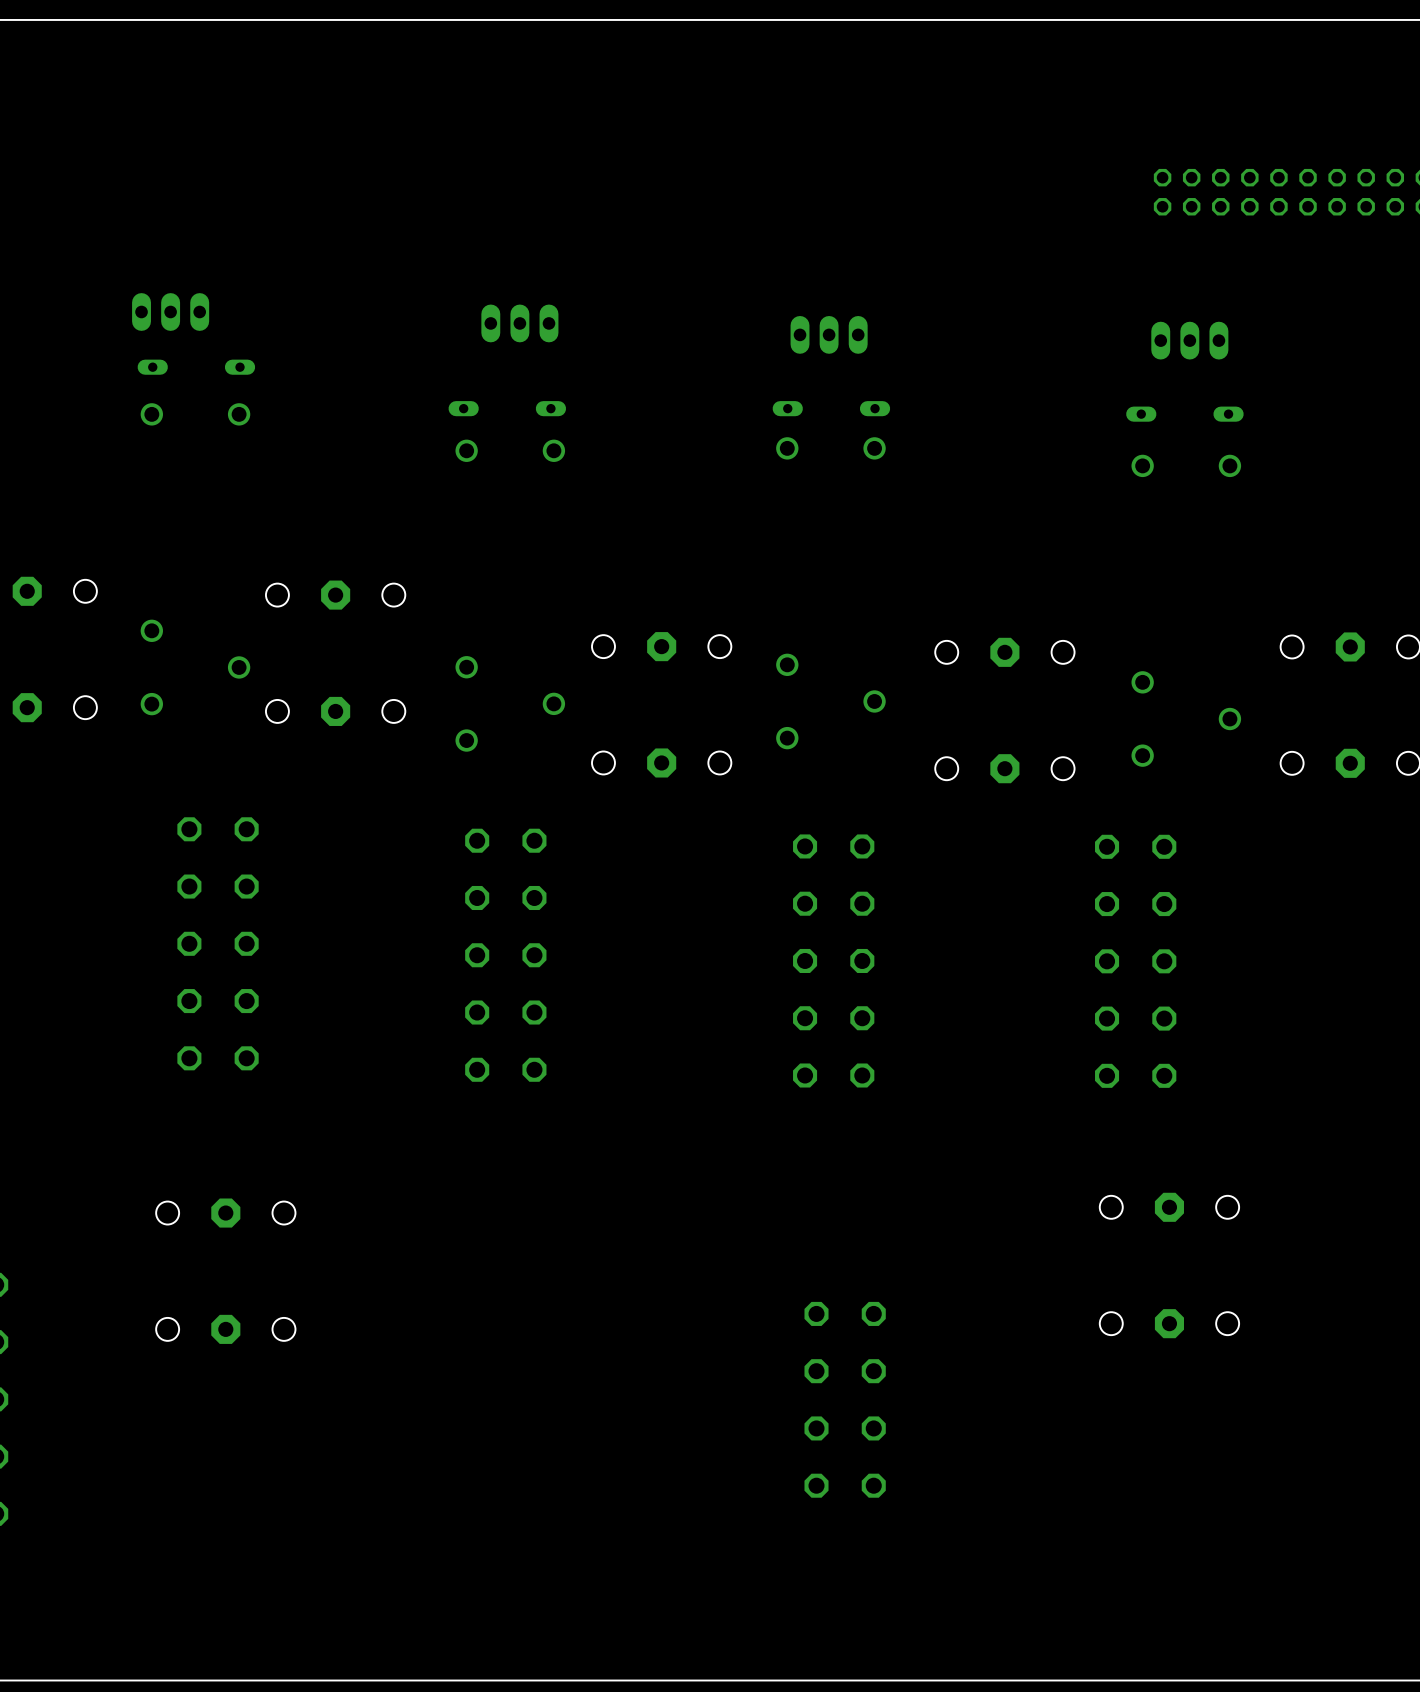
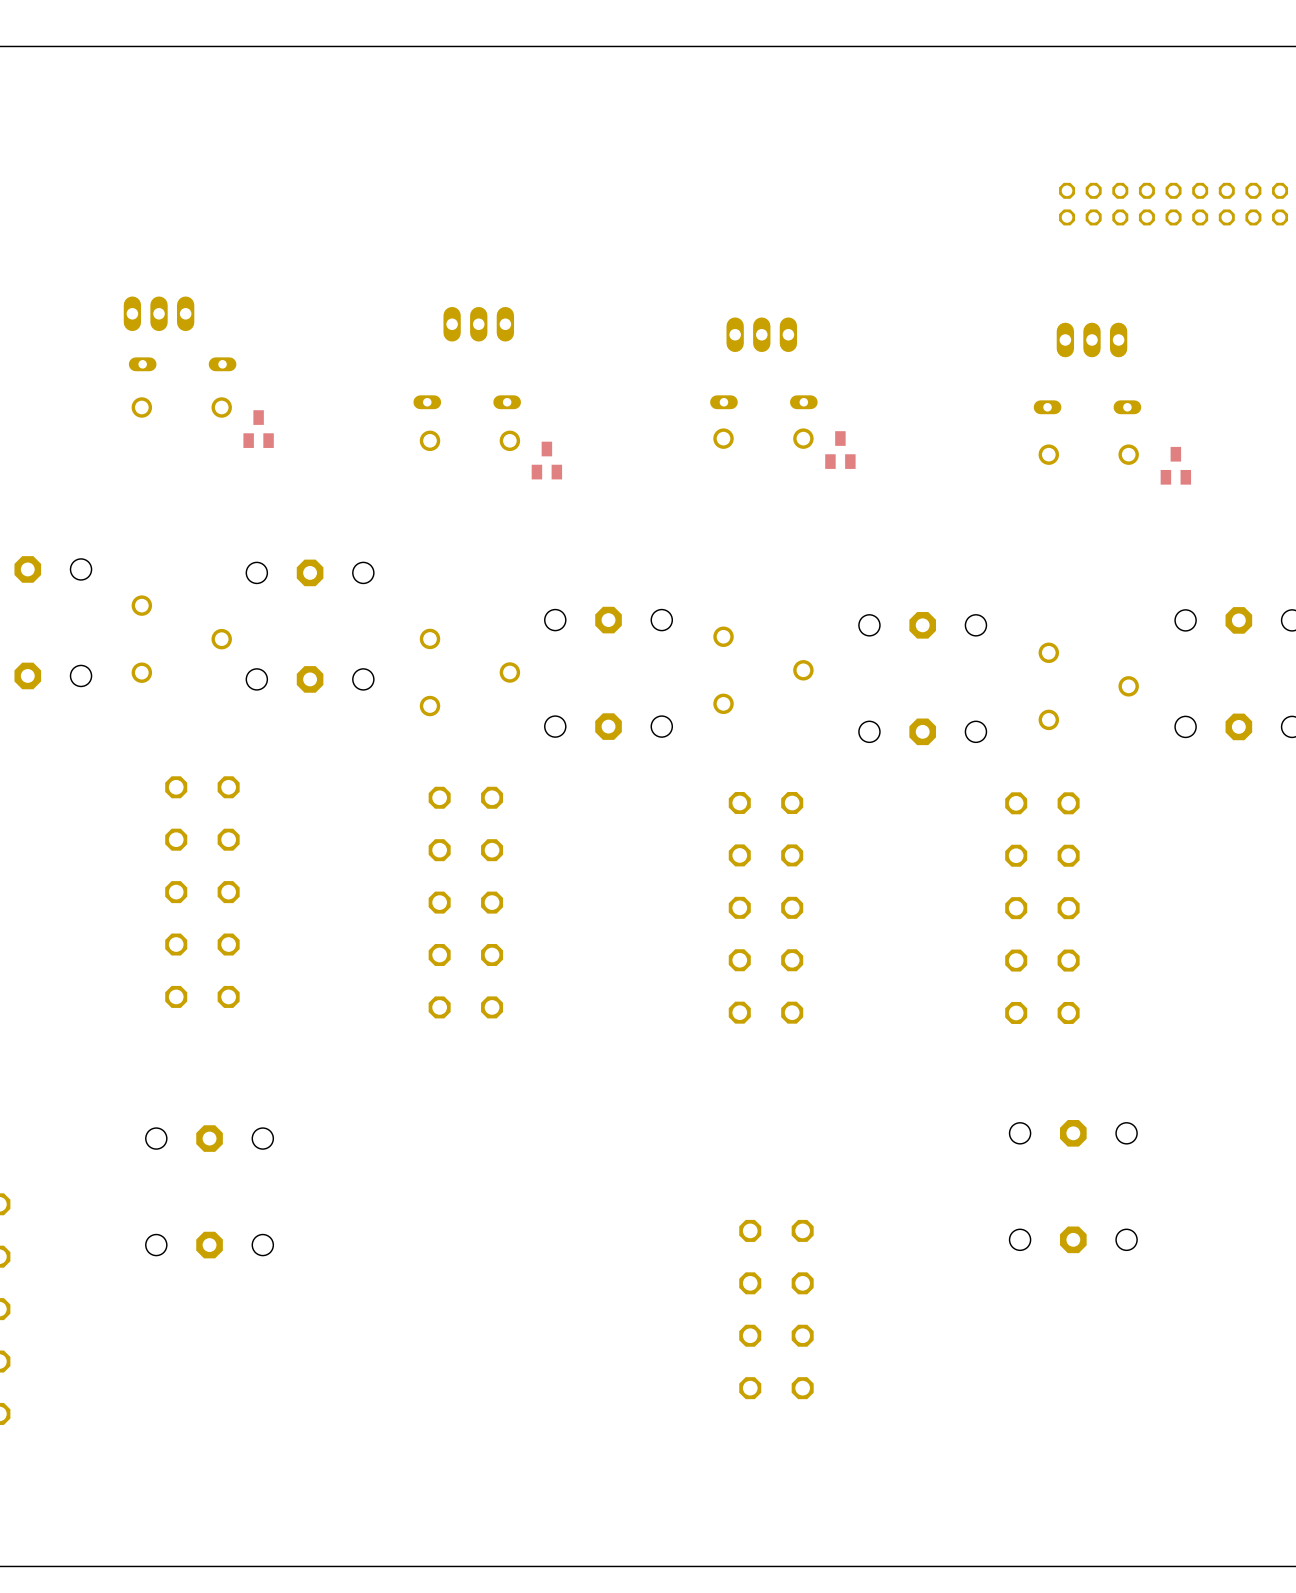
part: none -> (258, 429)
part: none -> (840, 450)
part: none -> (546, 460)
part: none -> (1175, 465)

